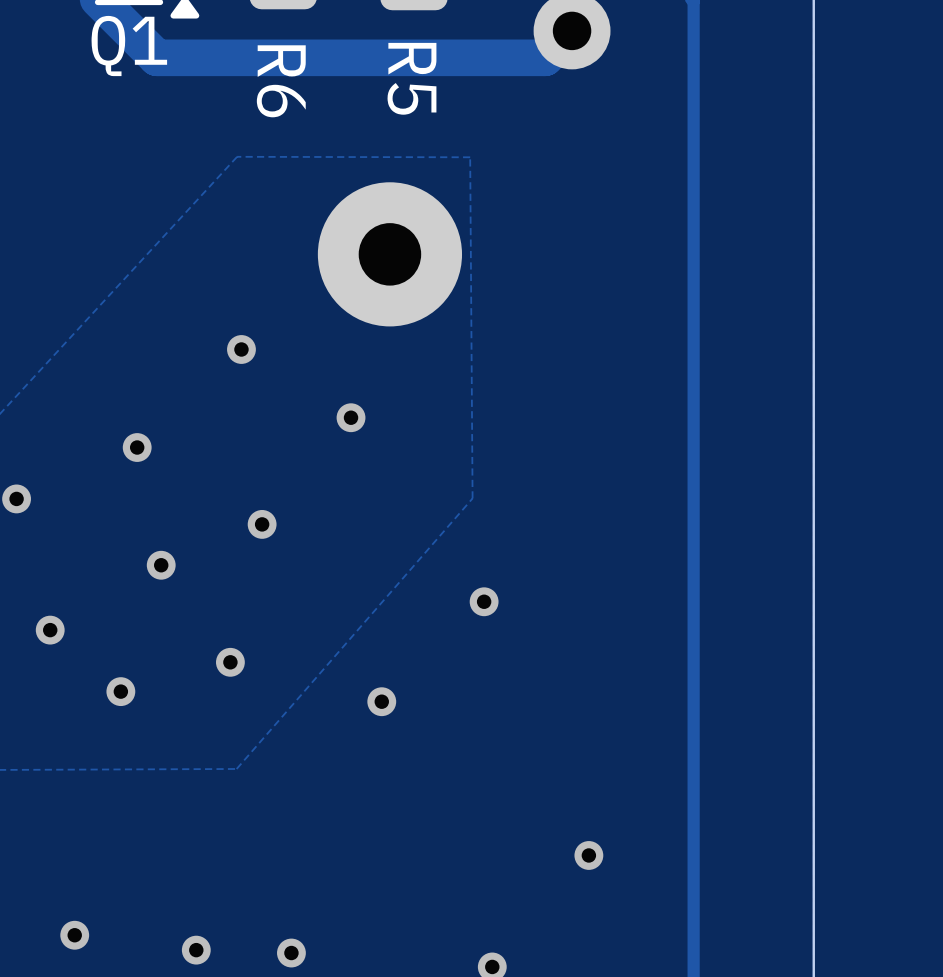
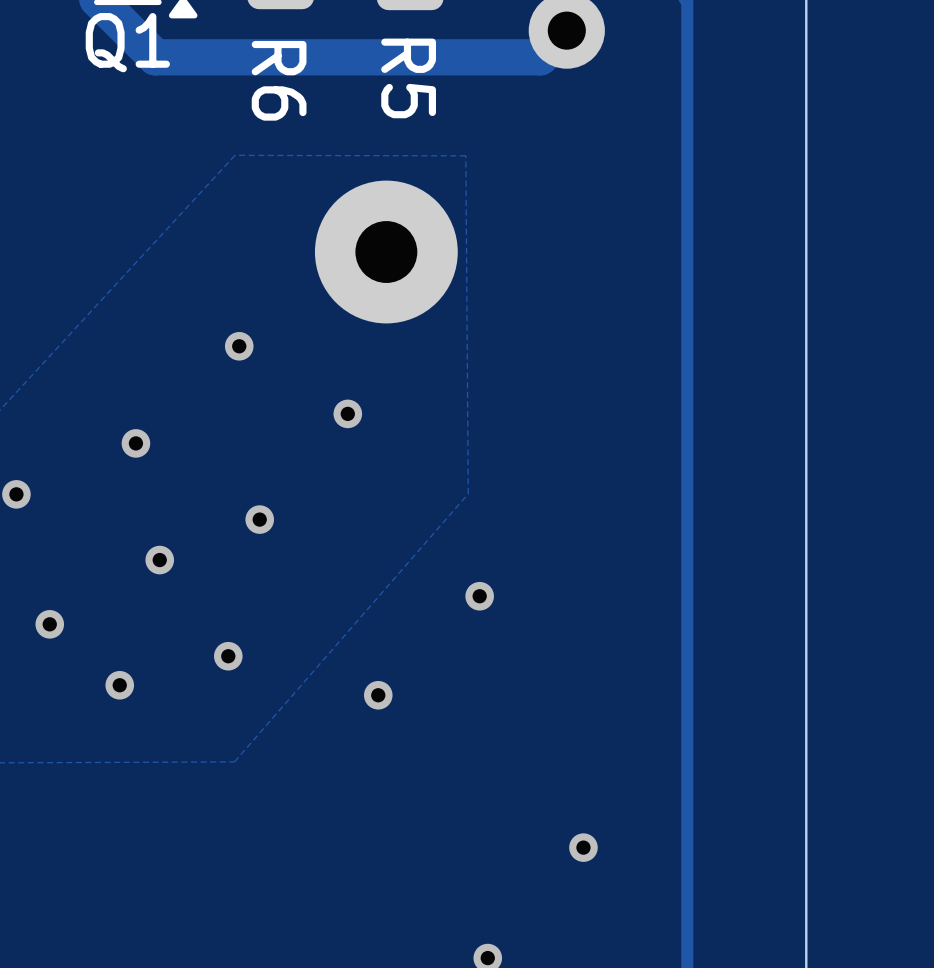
via: (74, 935) -> none
via: (196, 950) -> none
via: (291, 953) -> none

